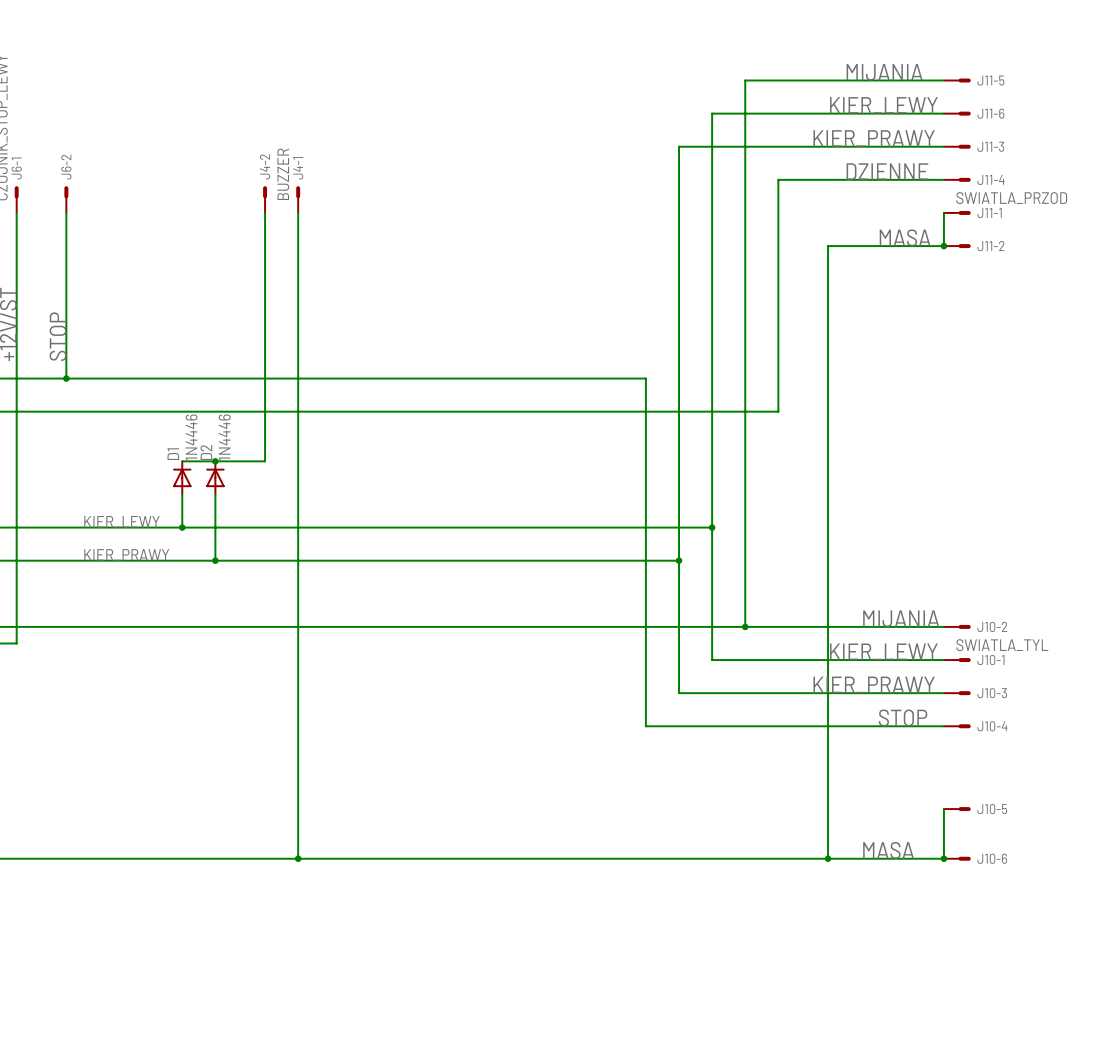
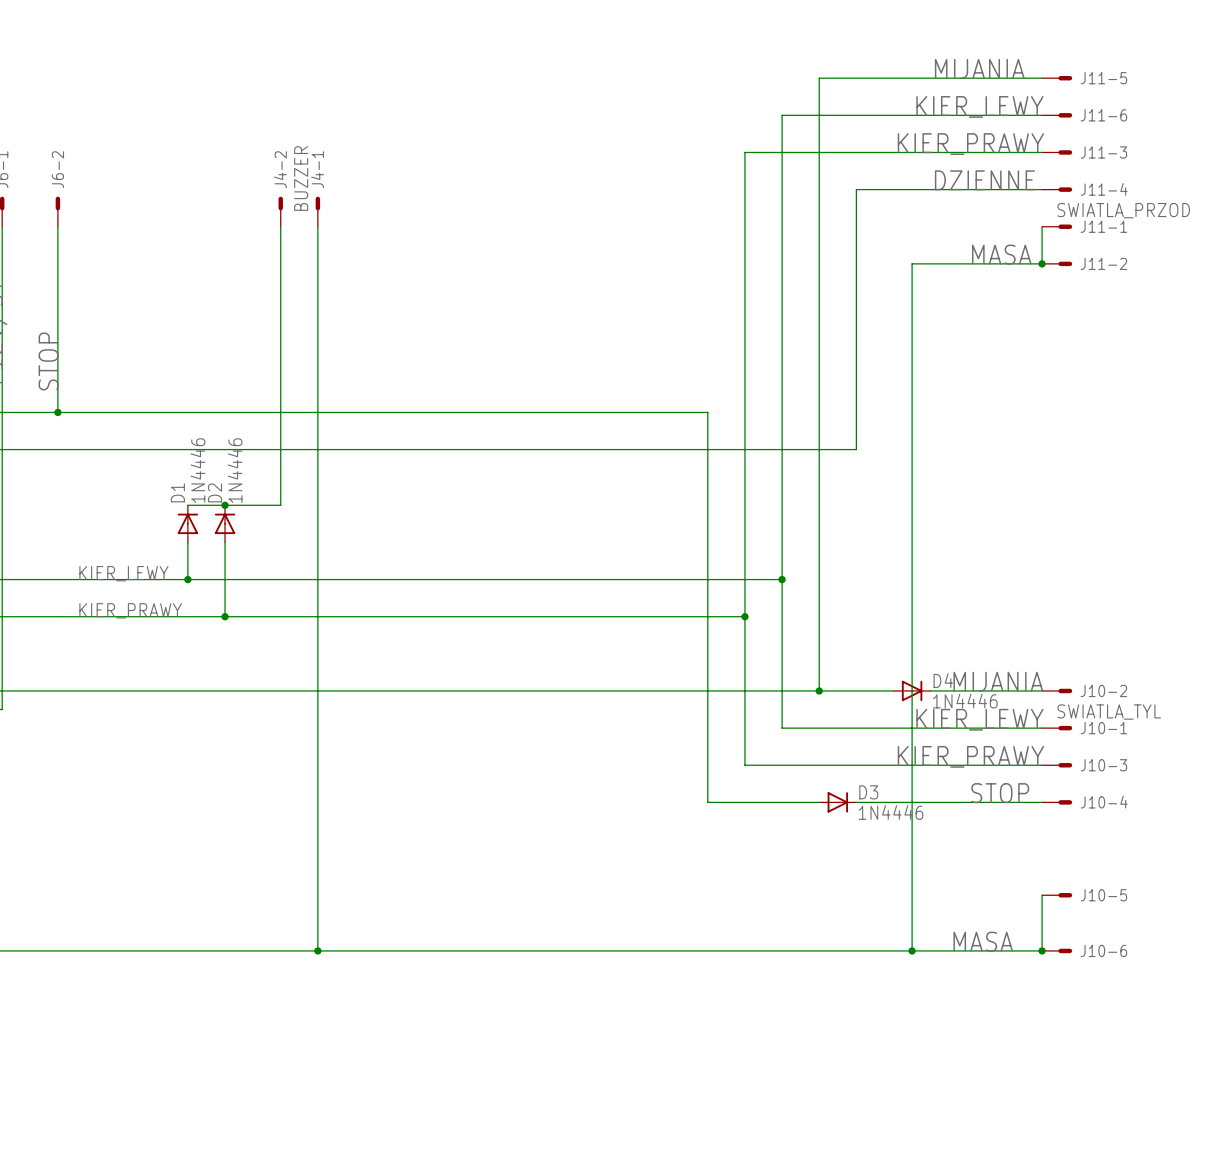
D4: none -> 1N4446 (912, 690)
D3: none -> 1N4446 (837, 802)

